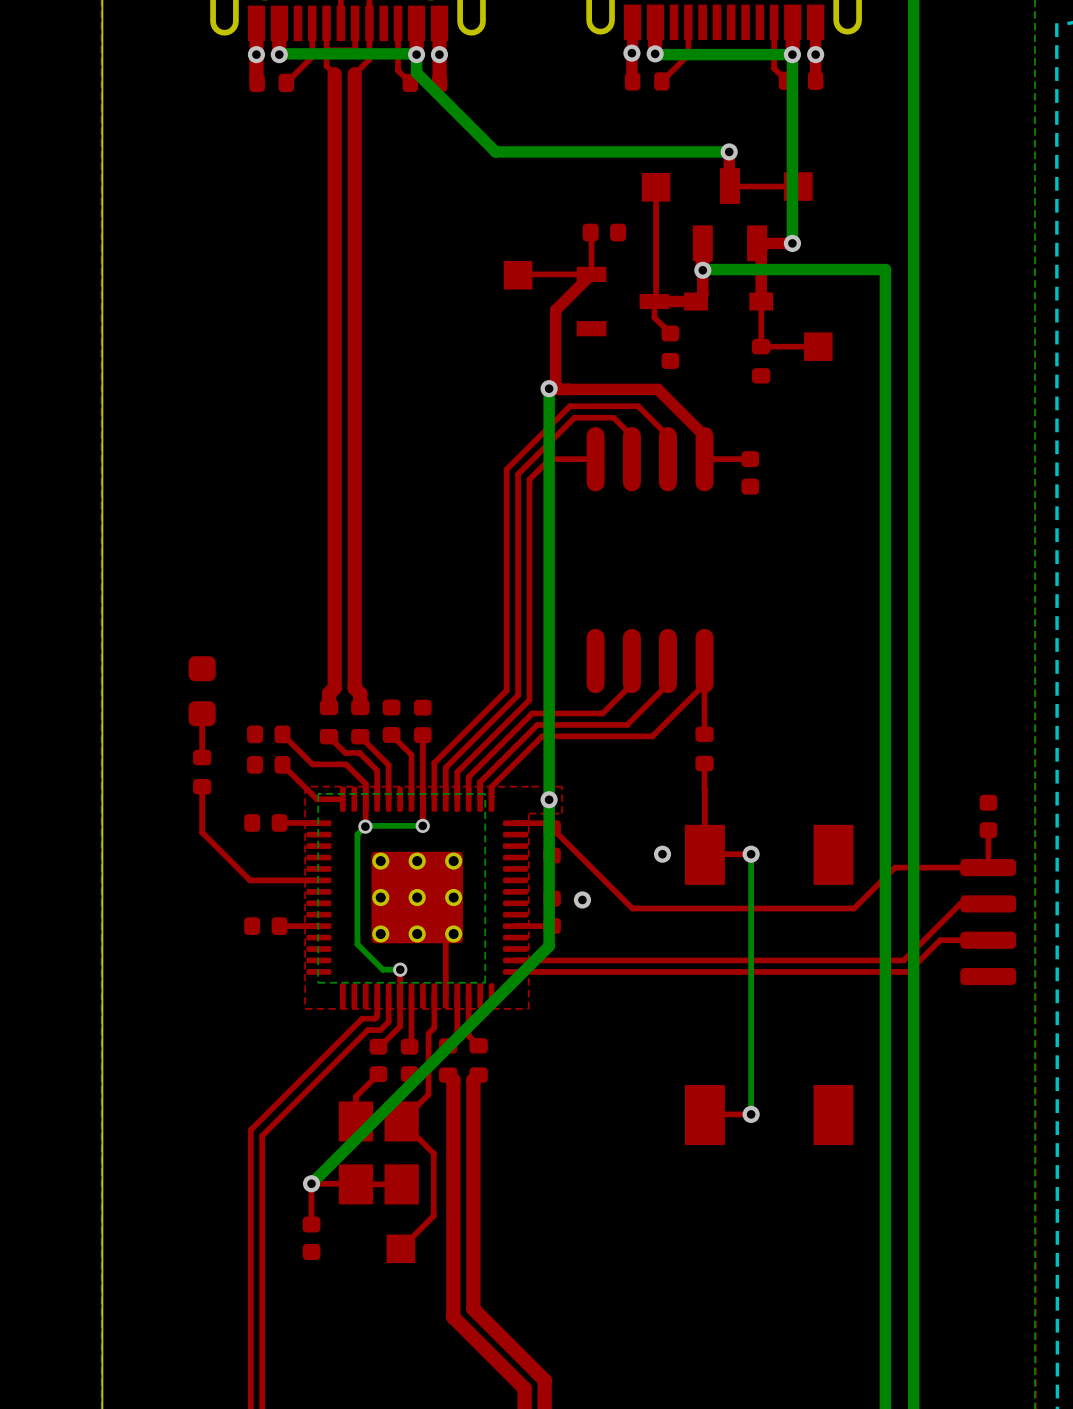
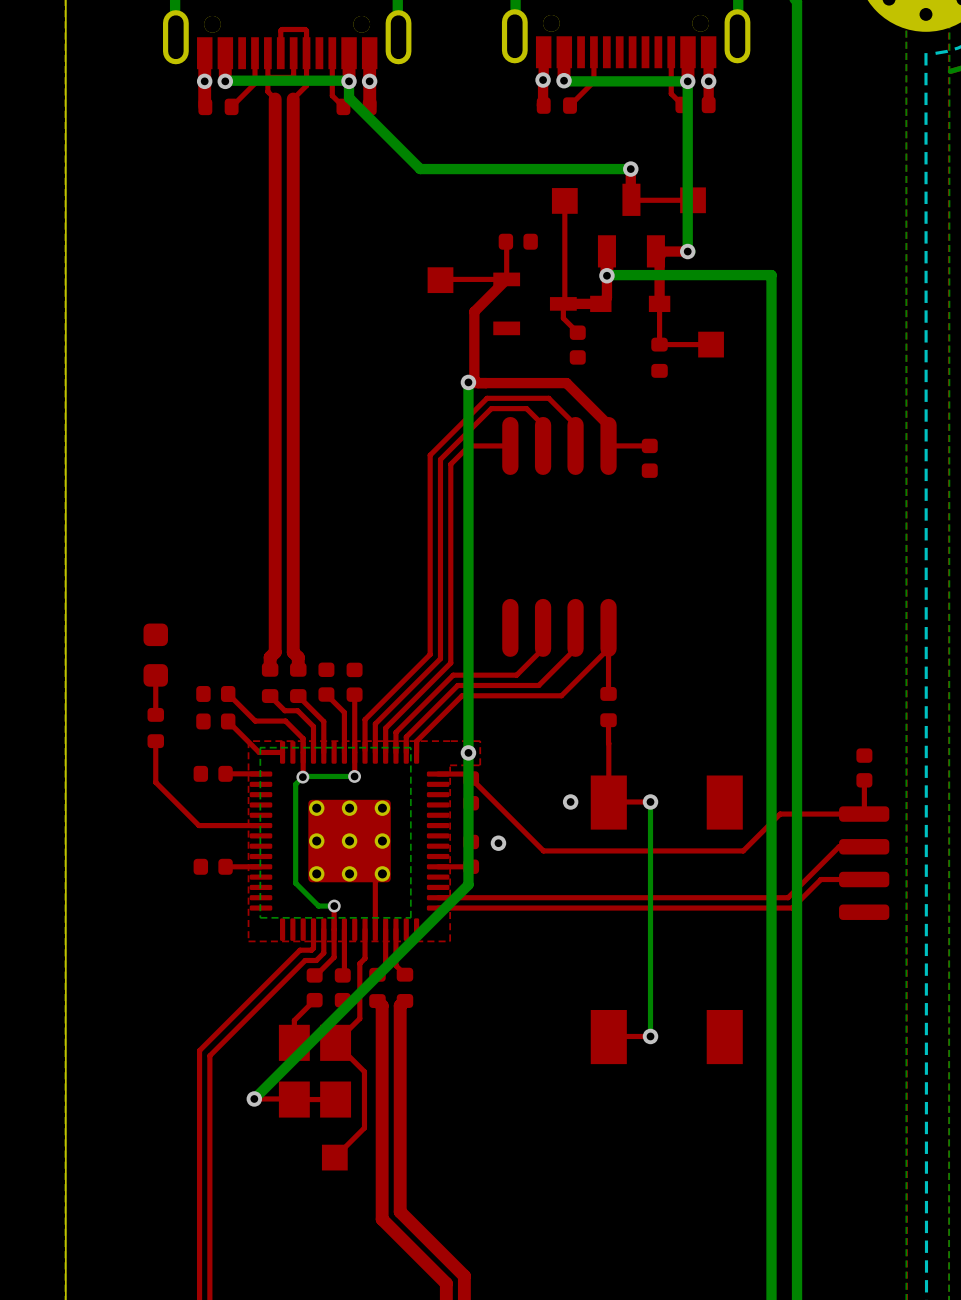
top track: (311, 1183) (311, 1224) -> none
part: (311, 1238) -> none

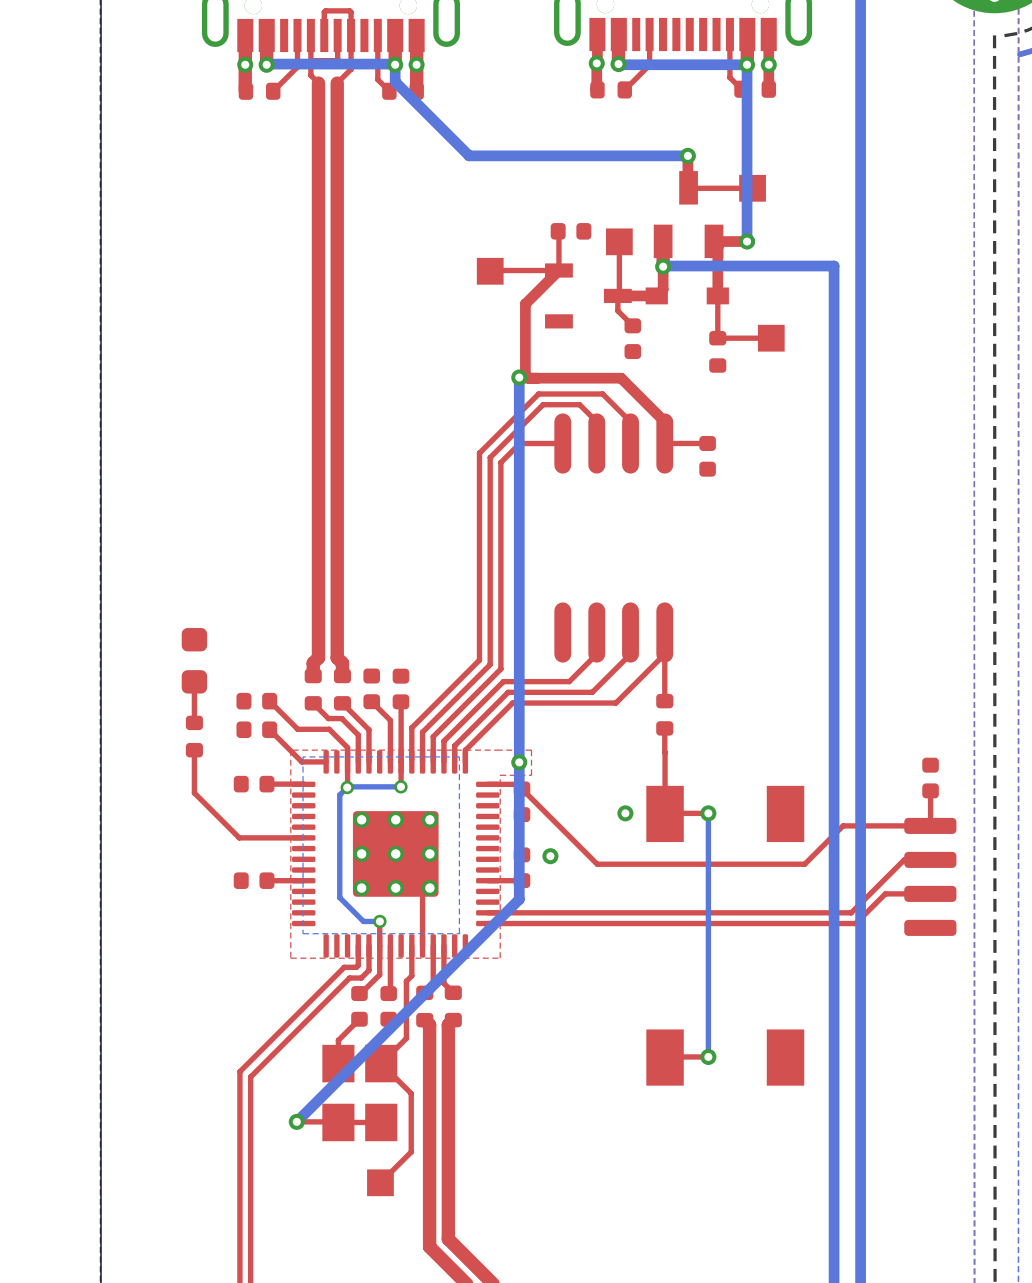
top track: (564, 200) (564, 251) -> none
part position: (564, 200) -> (619, 241)

